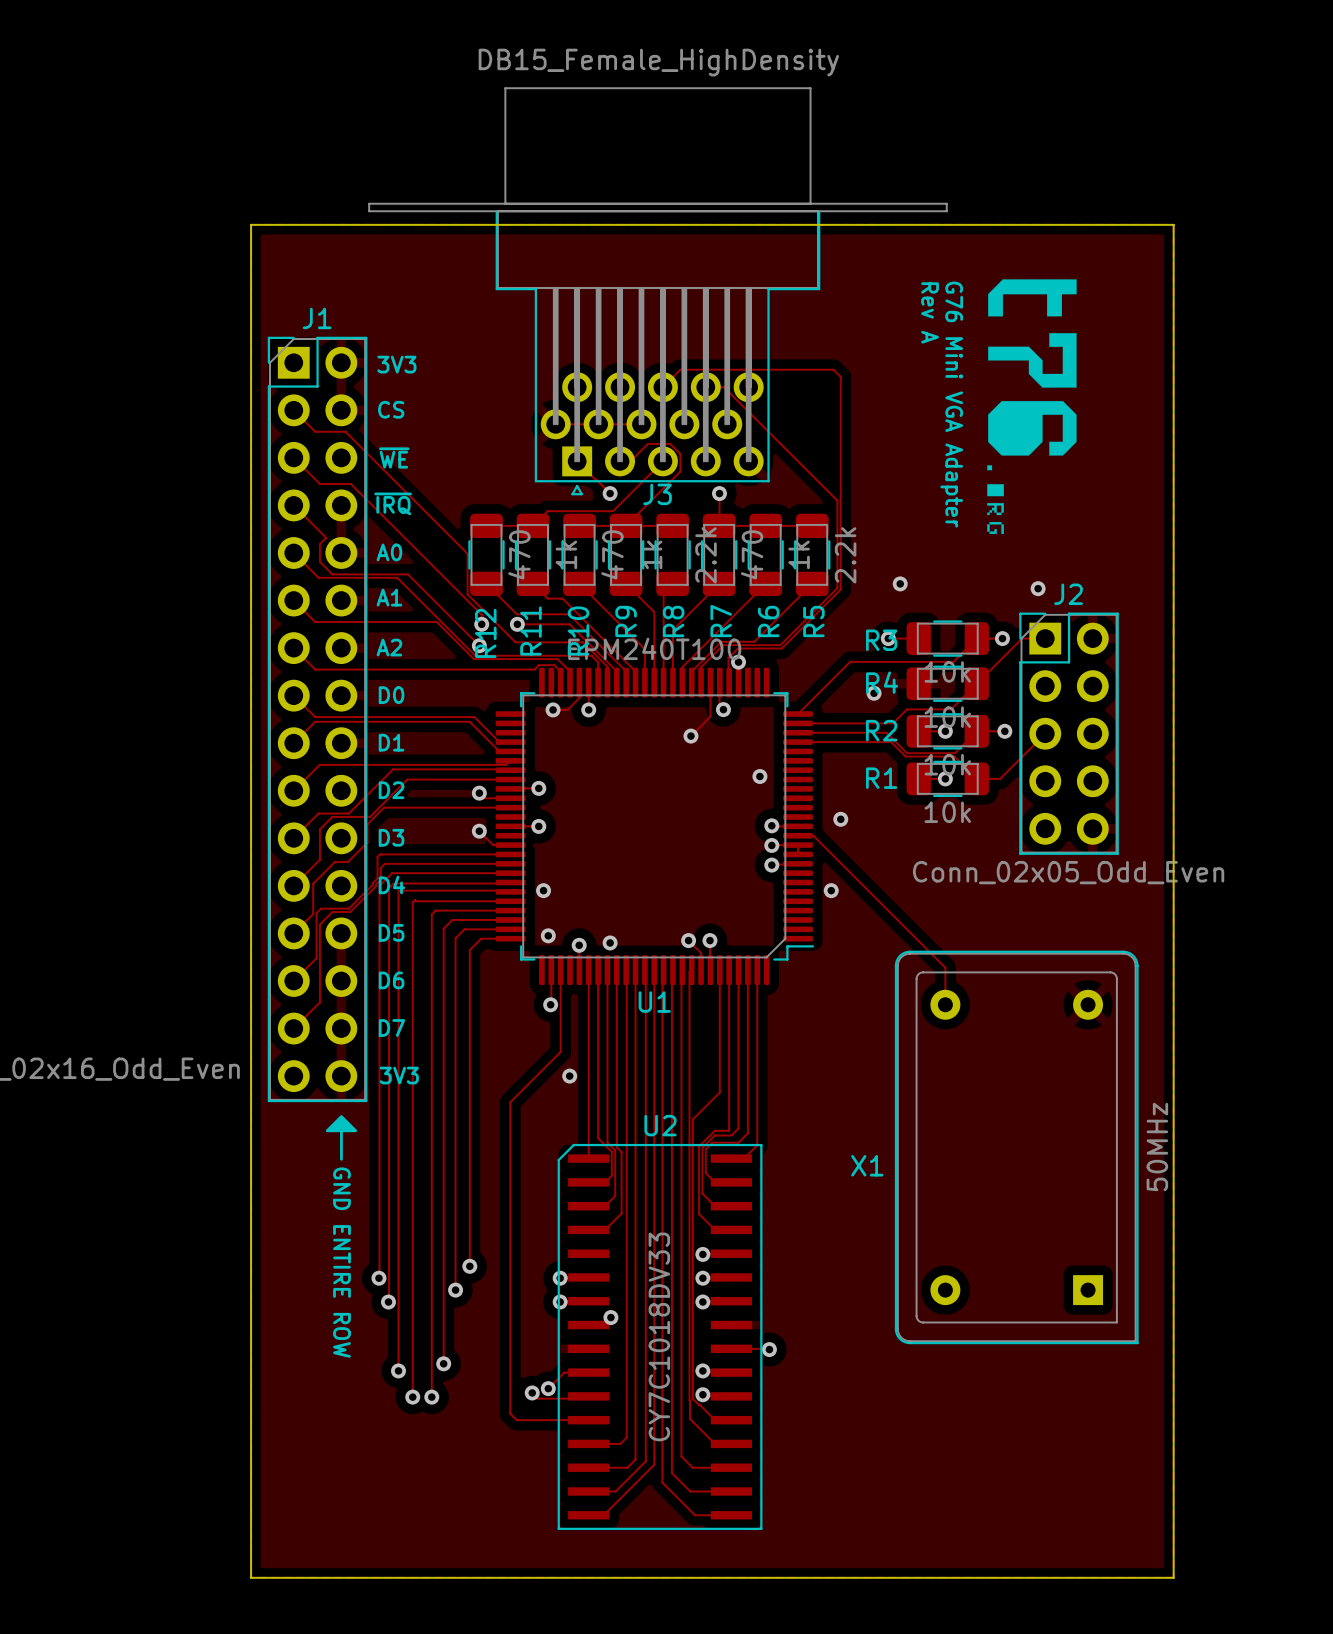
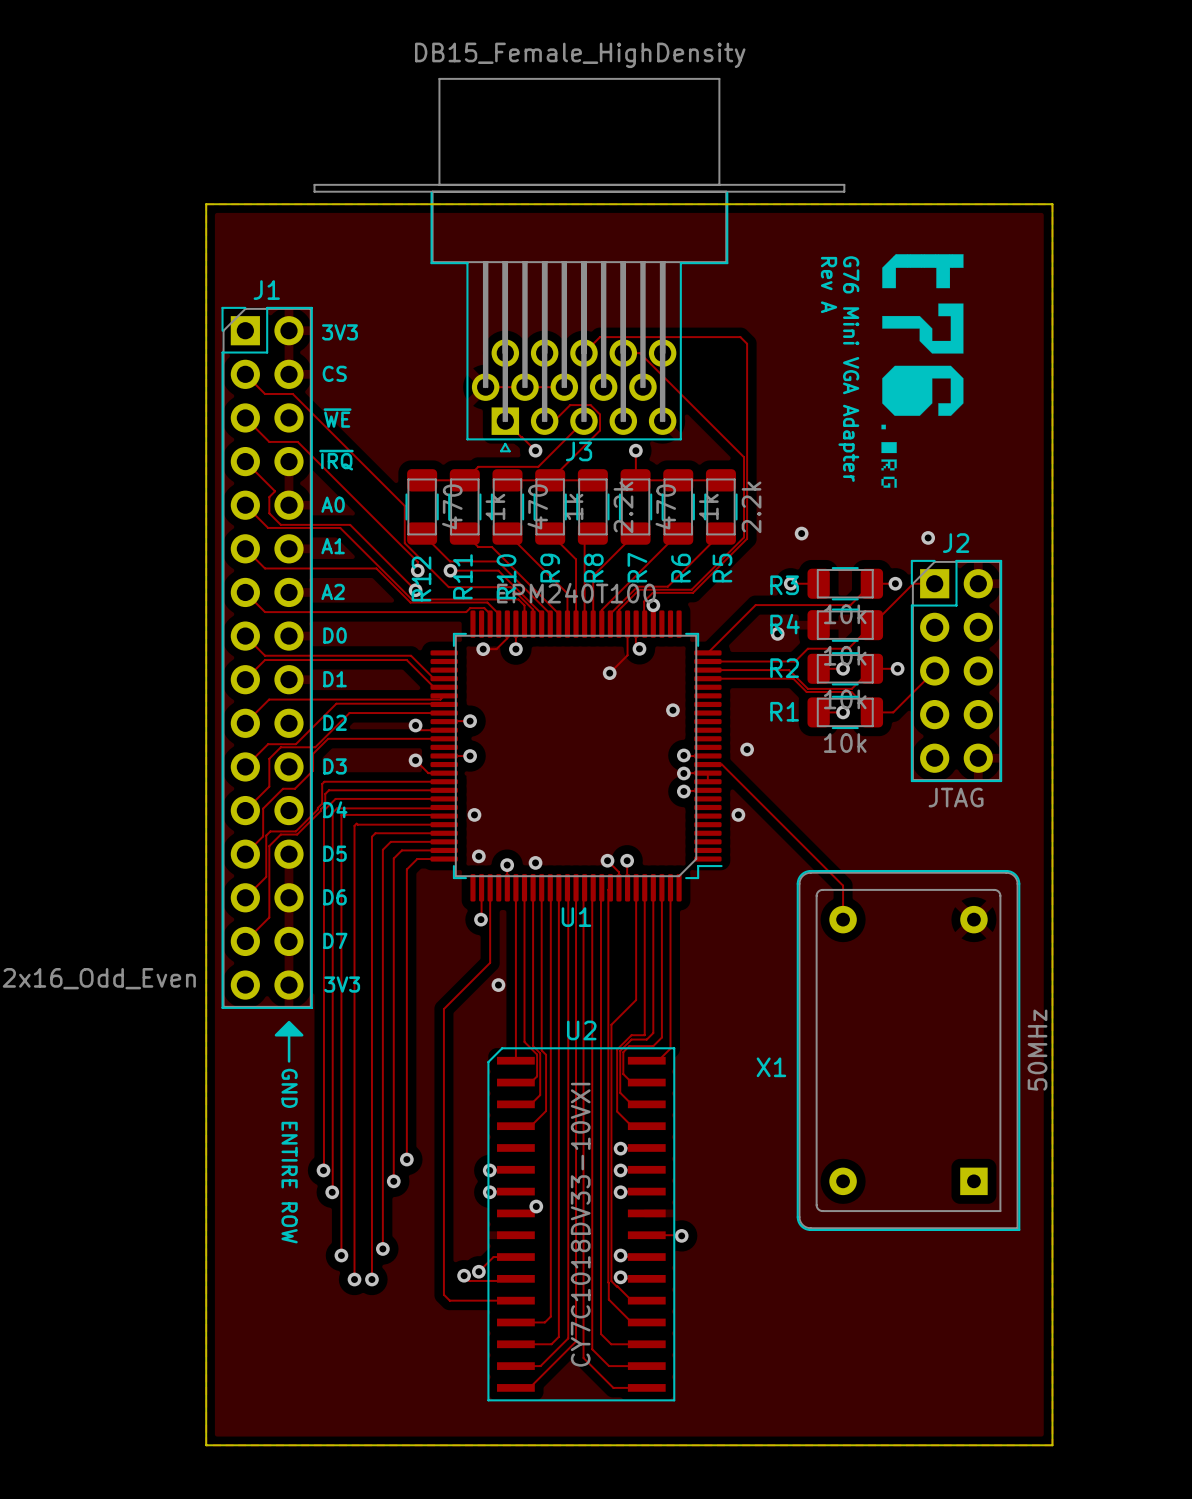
J2 value: Conn_02x05_Odd_Even (1068, 872) -> JTAG (956, 797)
U2 value: CY7C1018DV33 (659, 1336) -> CY7C1018DV33-10VXI (580, 1224)

